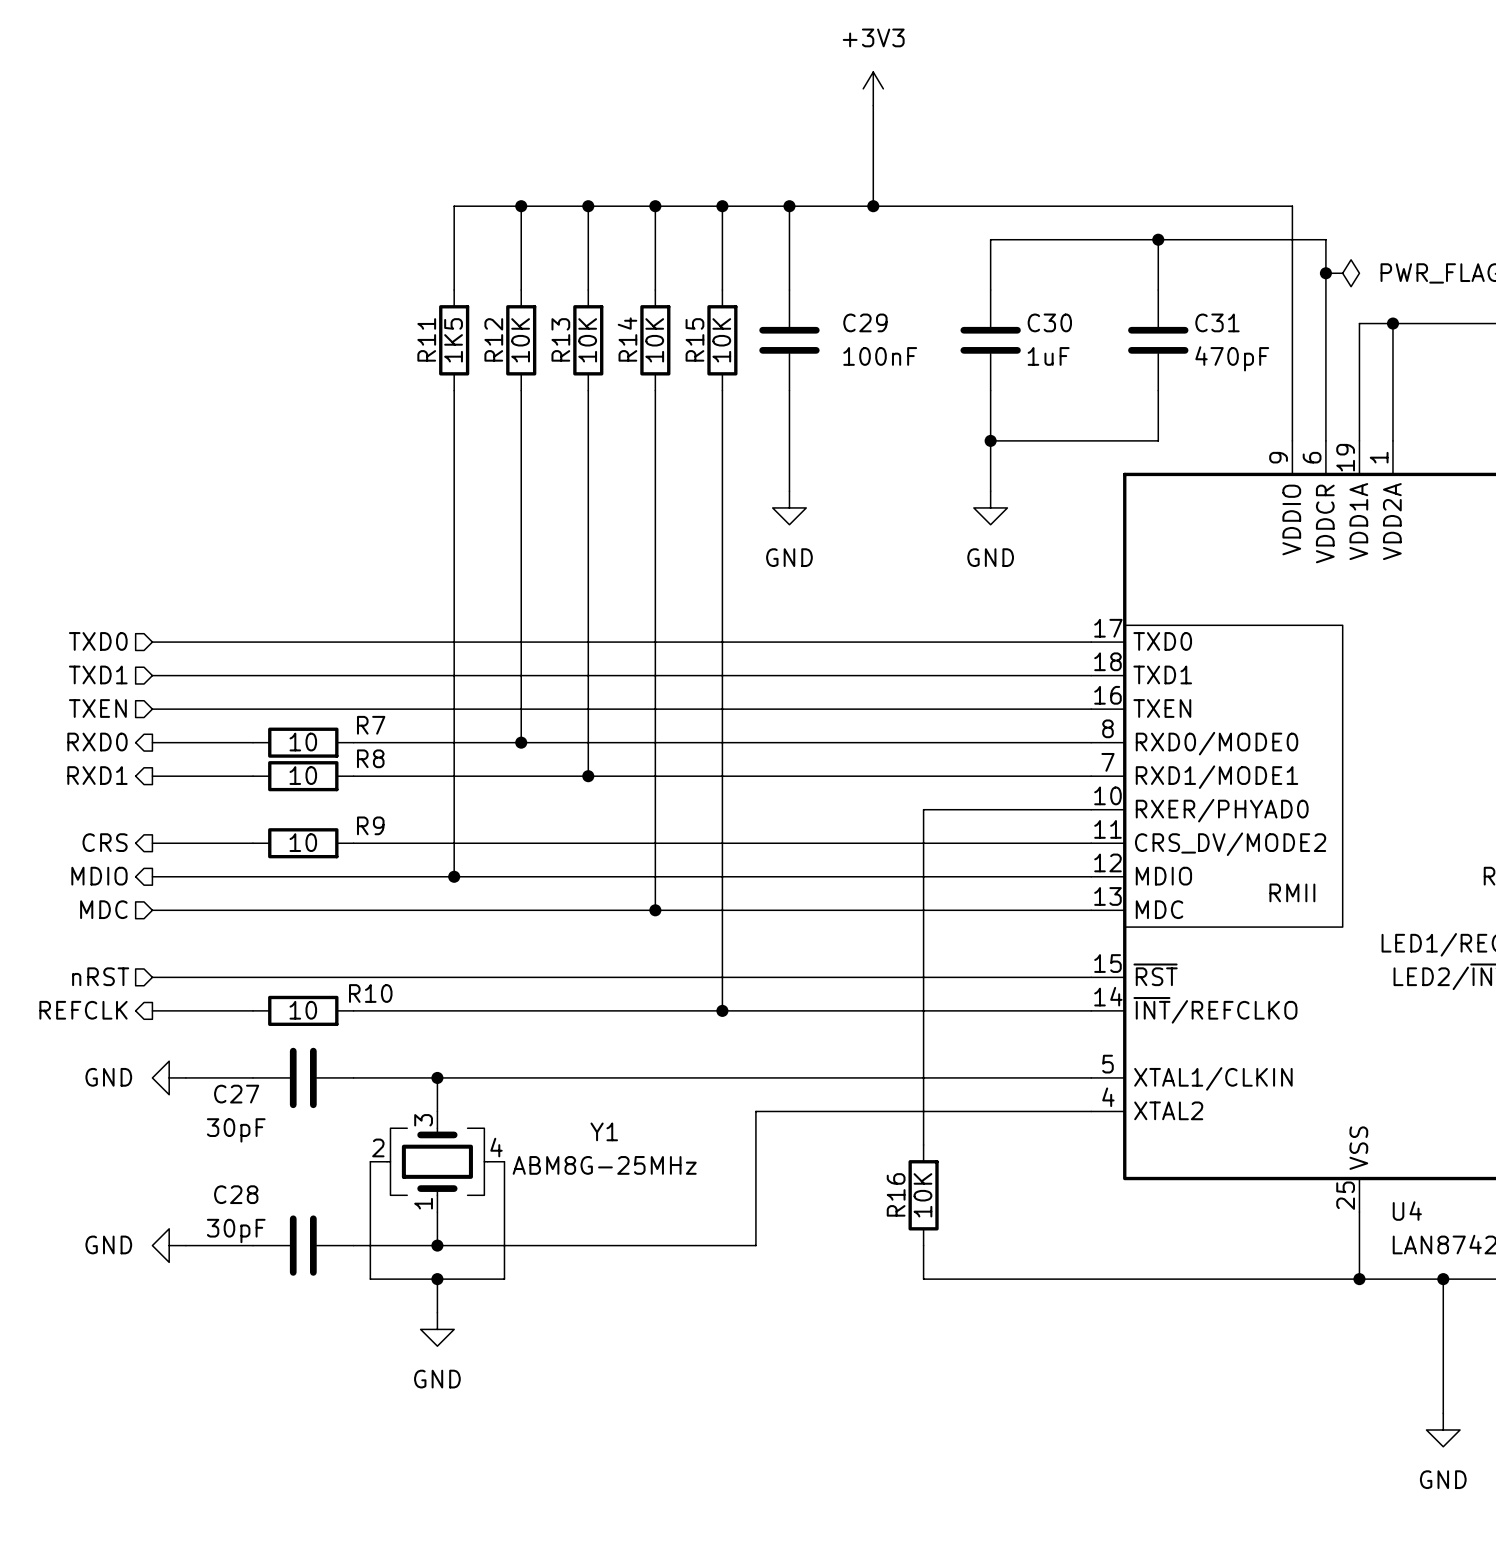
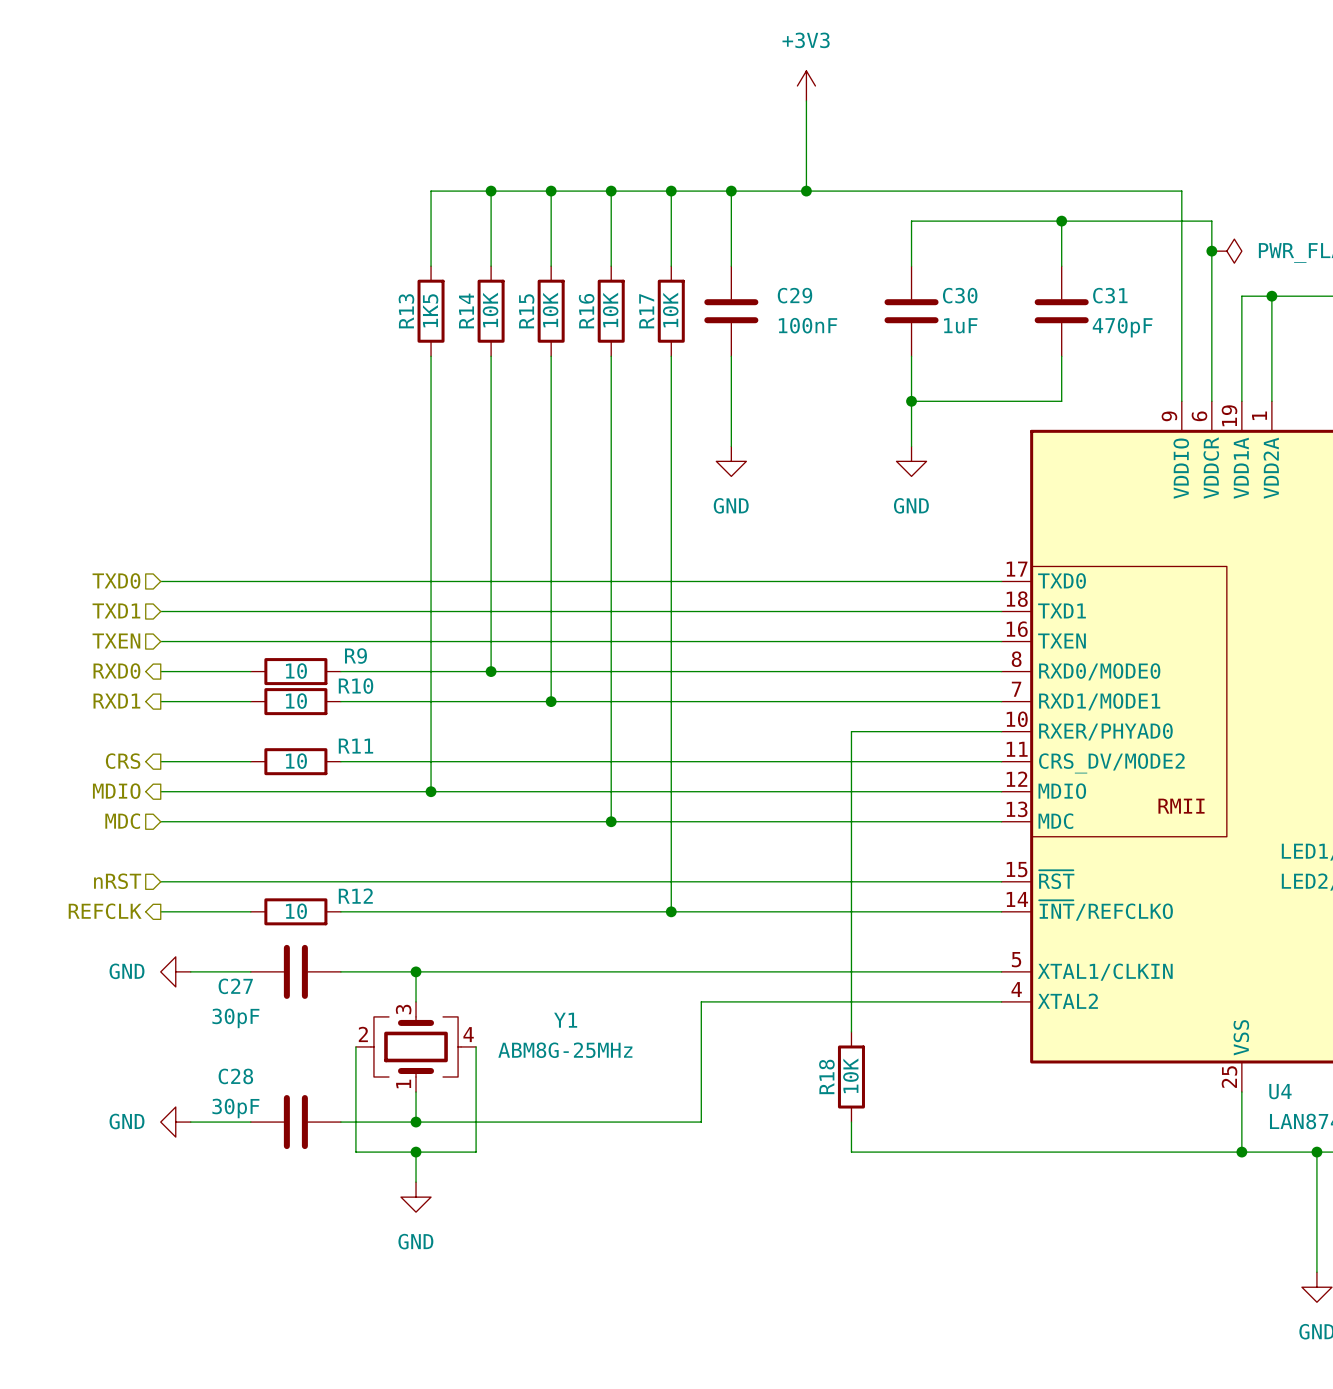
R11 name: R11 (426, 339) -> R13 (406, 311)
R12 name: R12 (493, 339) -> R14 (466, 310)
R13 name: R13 (560, 339) -> R15 (526, 311)
R14 name: R14 (627, 339) -> R16 (586, 311)
R15 name: R15 (694, 339) -> R17 (646, 311)
R7 name: R7 (371, 725) -> R9 (355, 656)
R8 name: R8 (370, 758) -> R10 (356, 686)
R9 name: R9 (370, 825) -> R11 (355, 746)
R10 name: R10 (370, 993) -> R12 (355, 896)
R16 name: R16 (896, 1194) -> R18 (826, 1076)

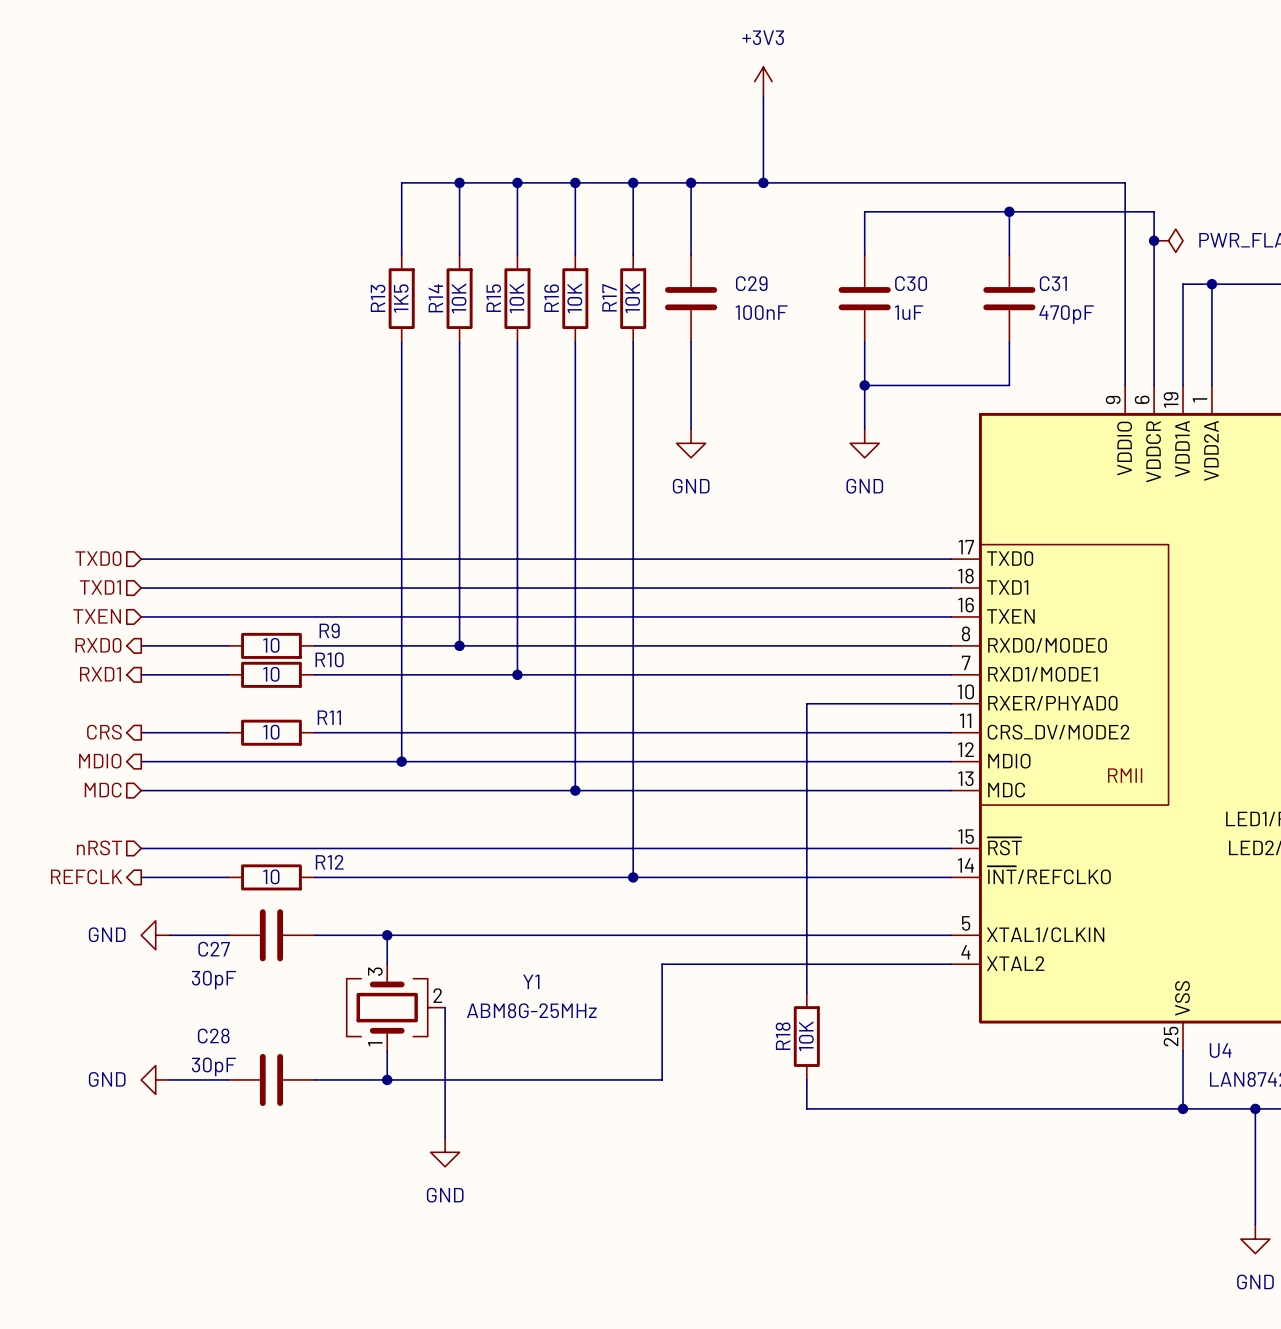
Y1 symbol: [355, 1001, 477, 1093] -> [346, 964, 446, 1052]
wire: (355, 1046) (355, 1152) (476, 1152) -> (445, 1137) (445, 1108)
wire: (416, 1152) (416, 1182) -> none
junction: (416, 1152) -> none
power symbol position: GND (416, 1197) -> GND (445, 1152)

